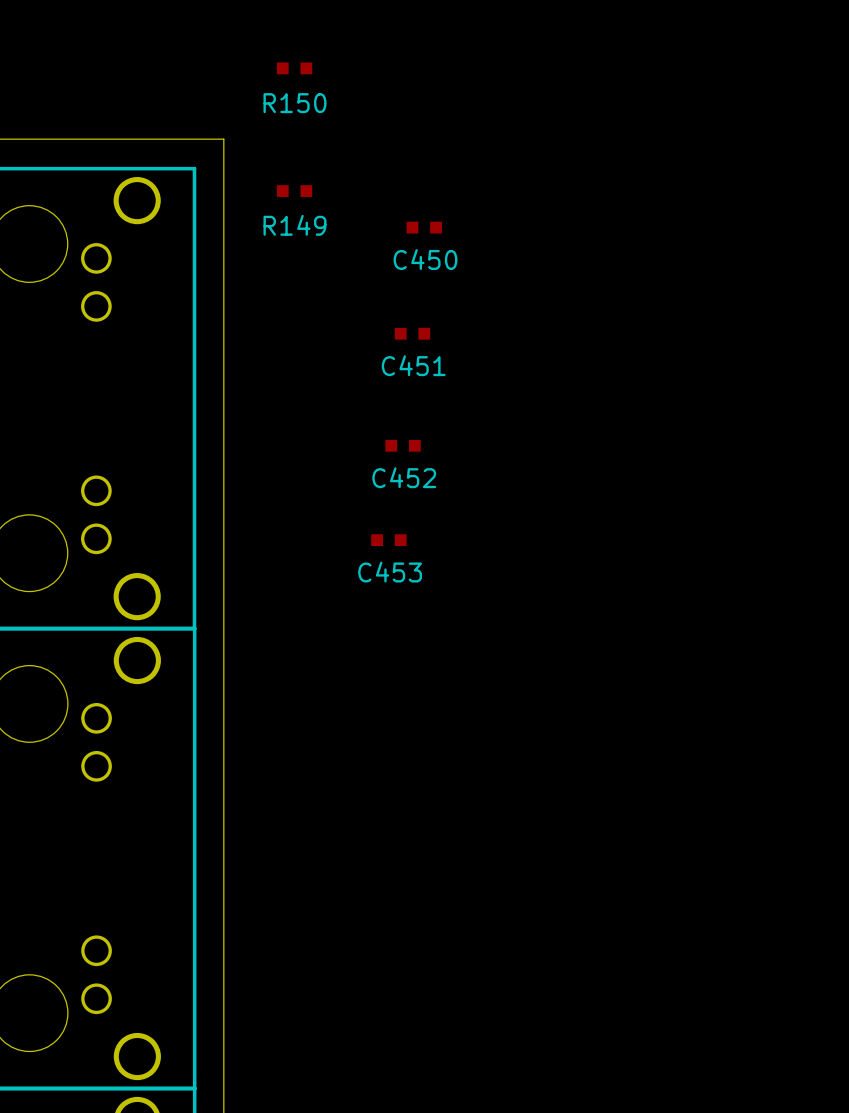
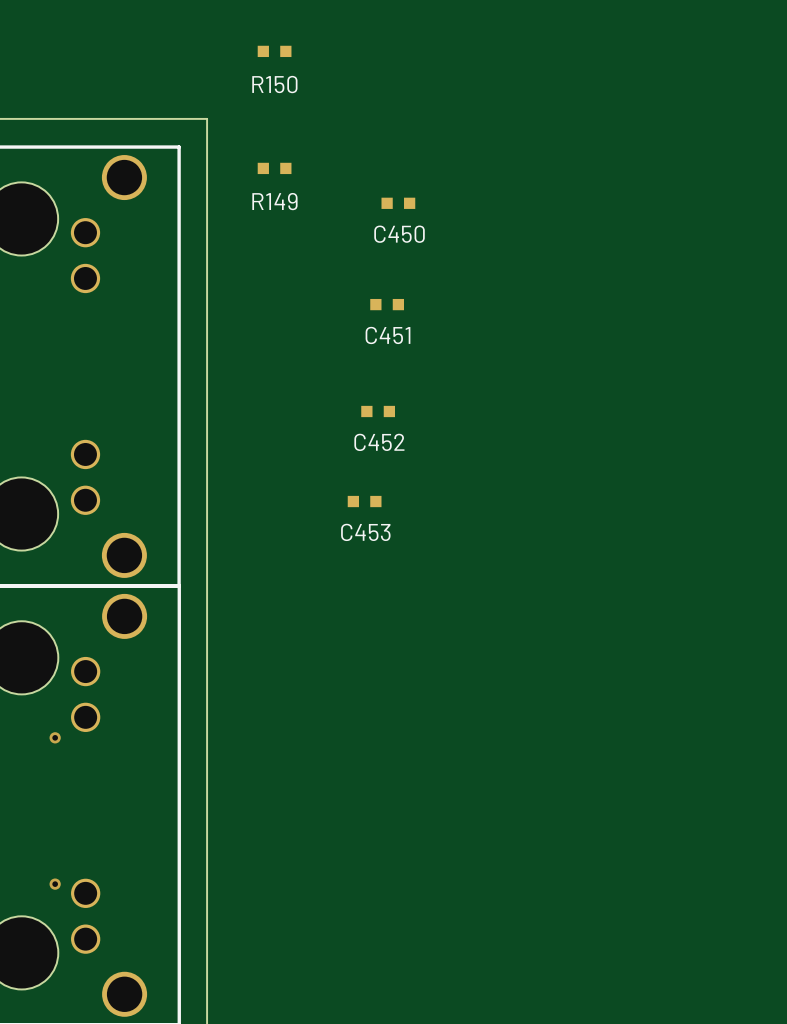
via: none -> (55, 737)
via: none -> (55, 884)

